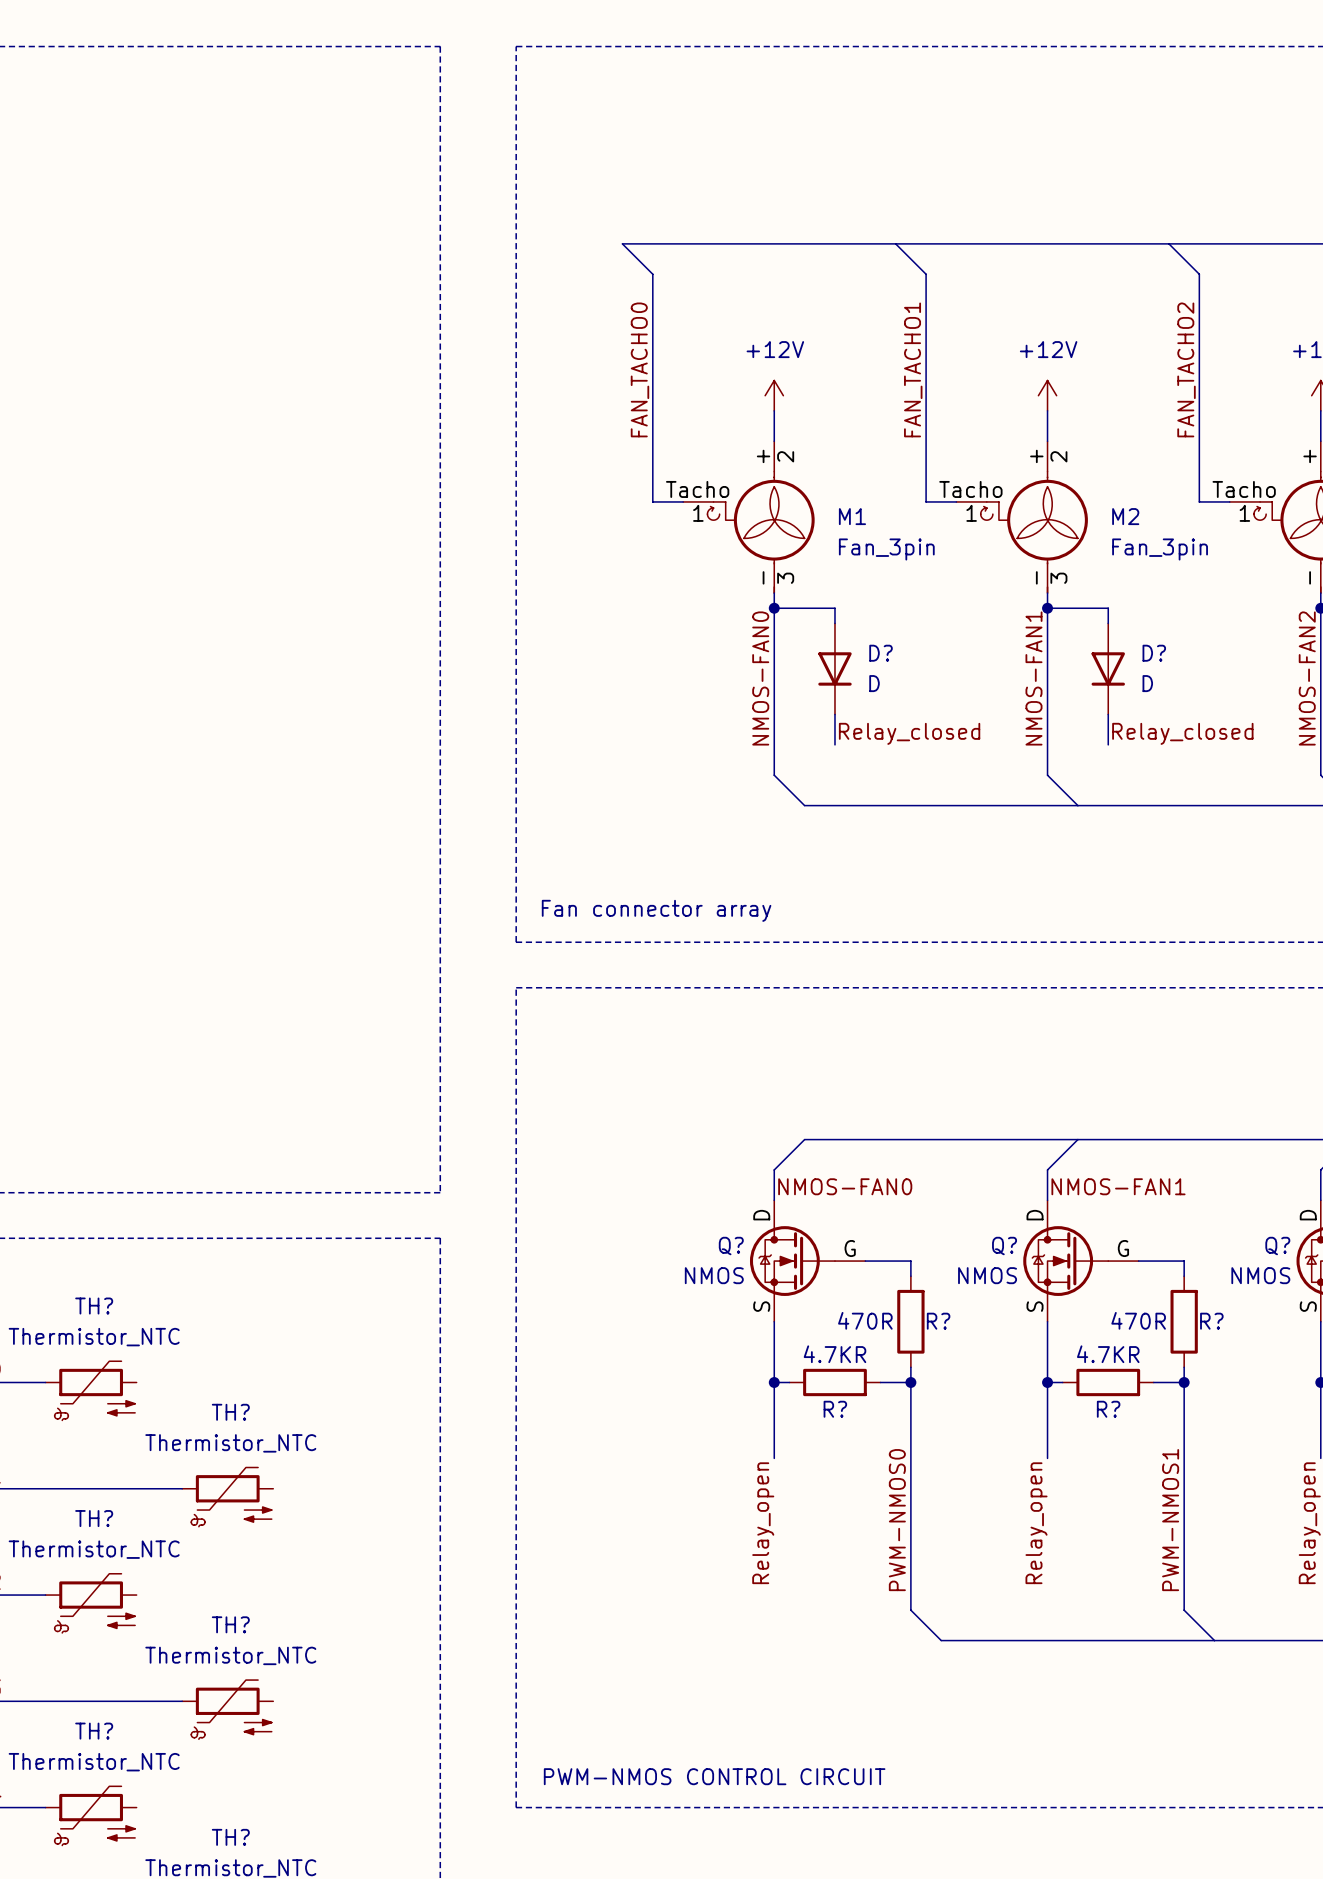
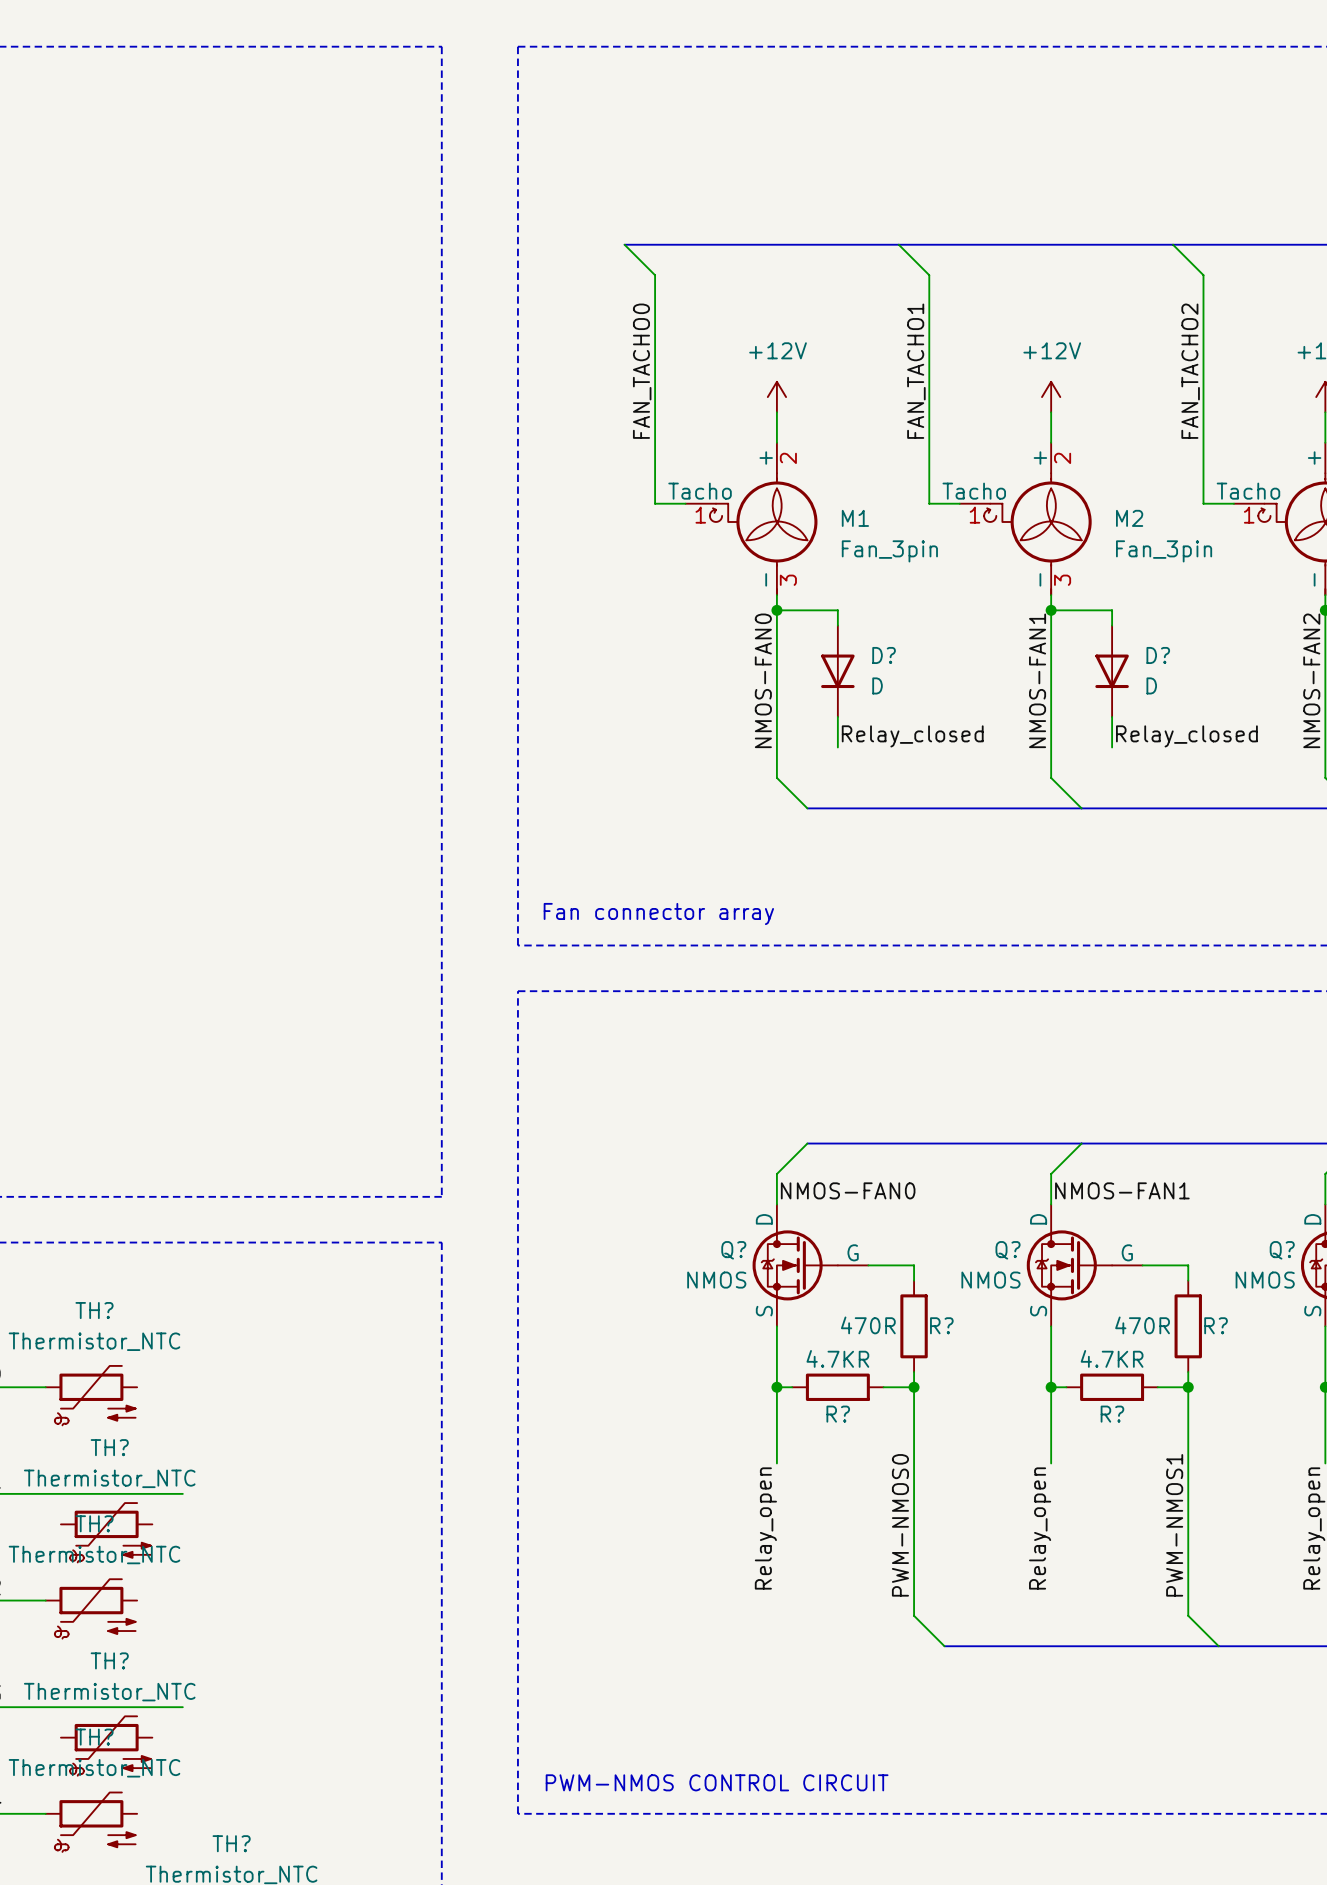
TH?: Thermistor_NTC (227, 1497) -> none
TH?: none -> Thermistor_NTC (106, 1532)
TH?: Thermistor_NTC (227, 1709) -> none
TH?: none -> Thermistor_NTC (106, 1746)

